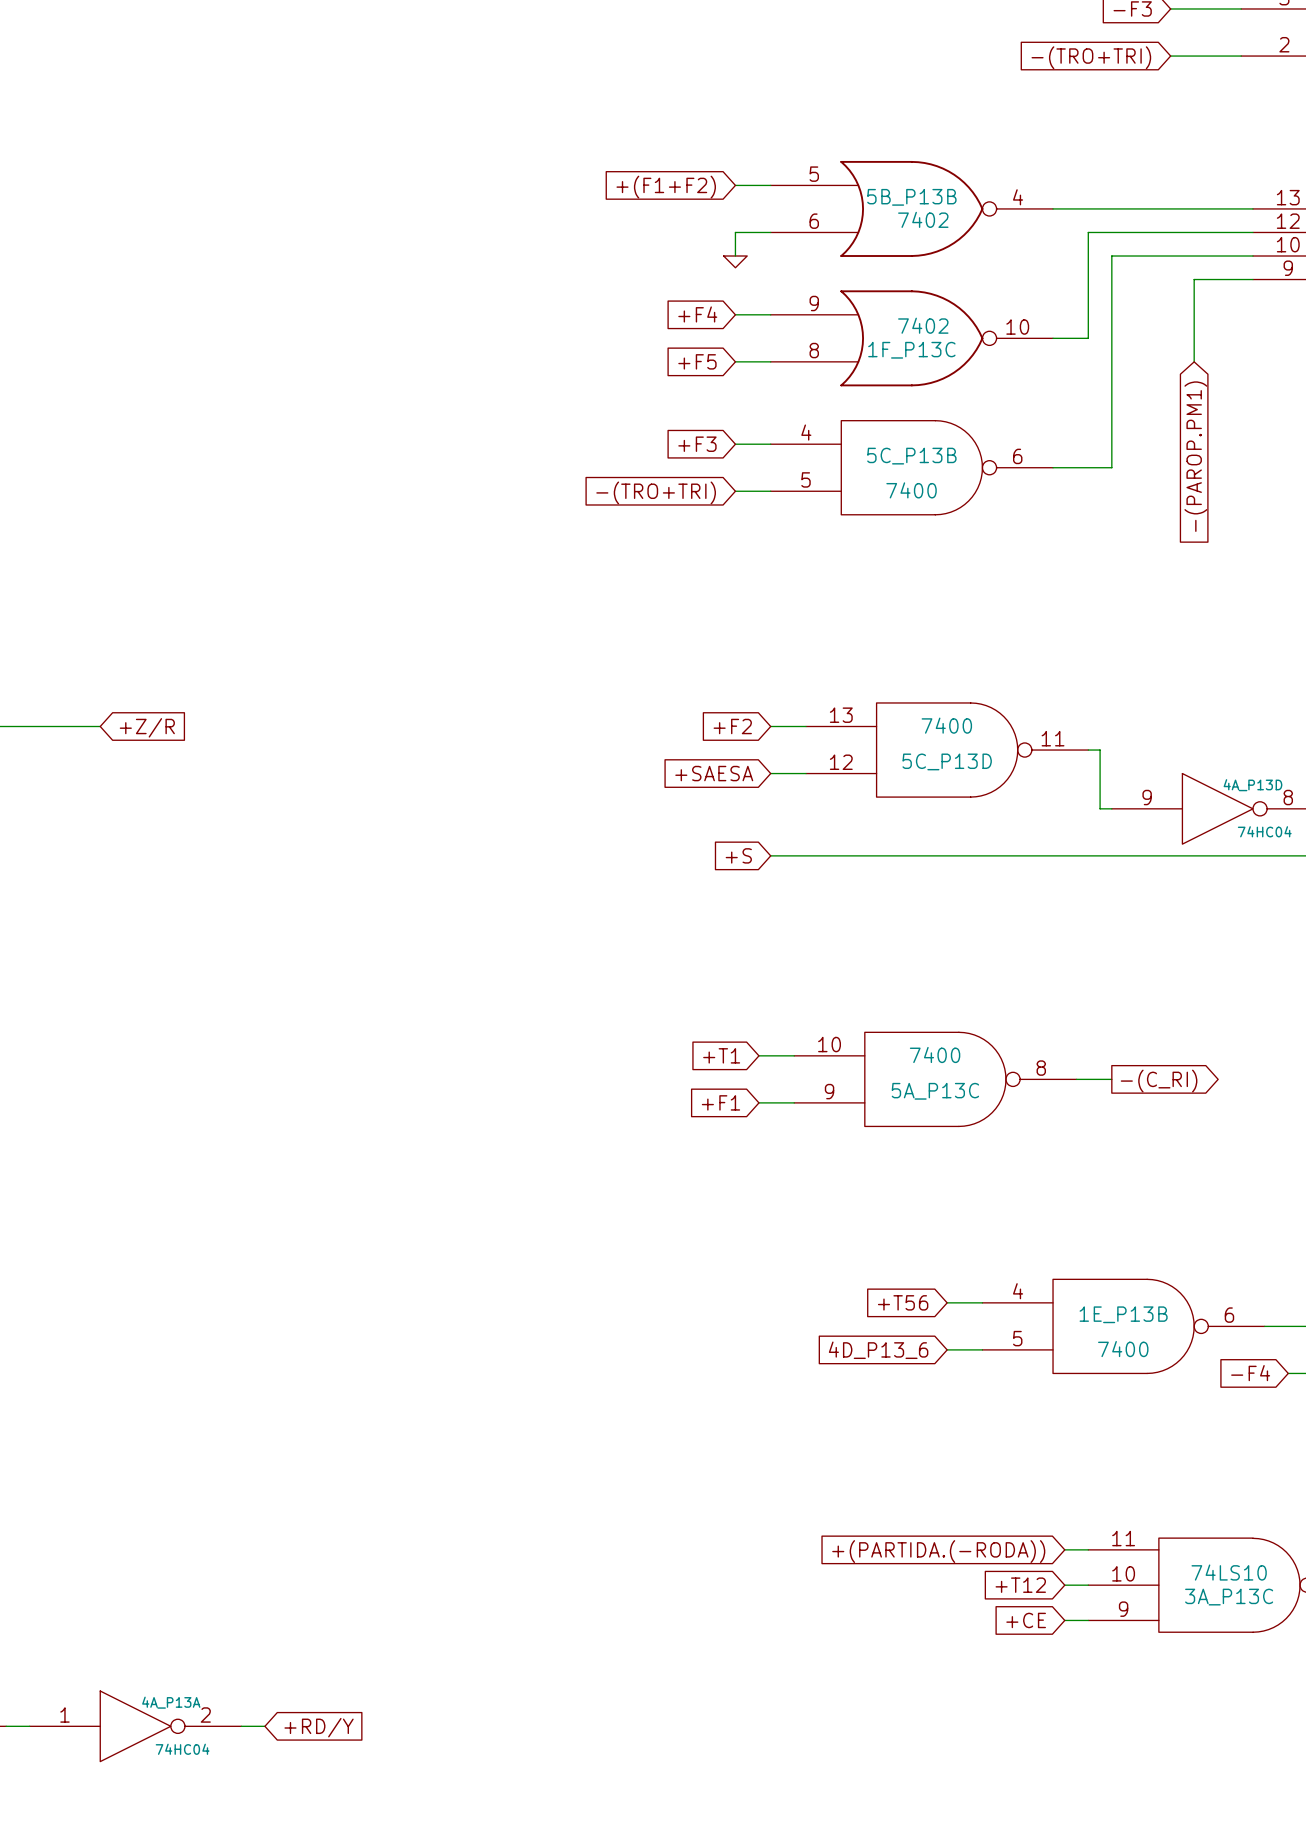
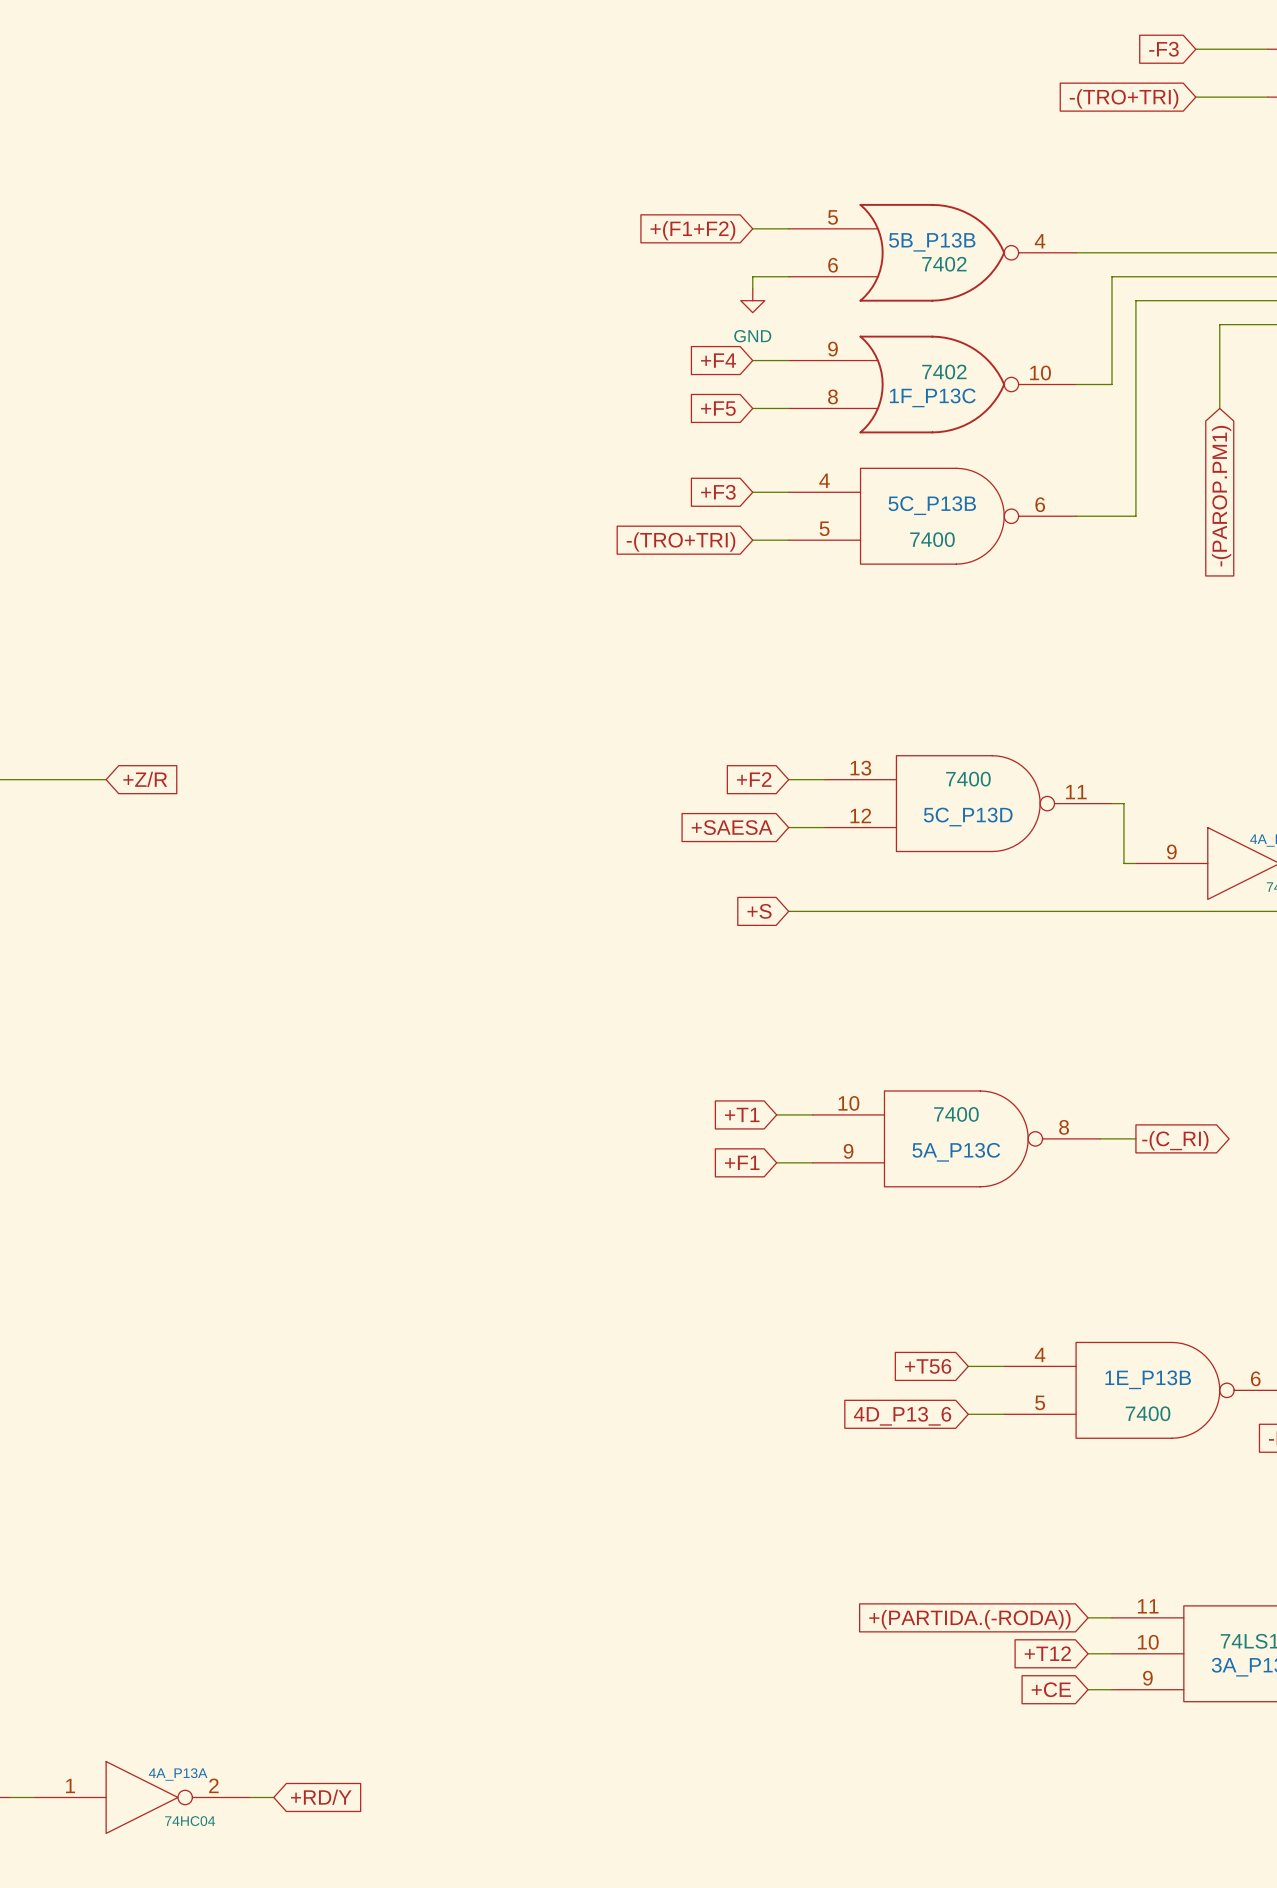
power symbol shape: [723, 256, 748, 268] -> [740, 288, 765, 313]
power symbol text: none -> GND (752, 336)

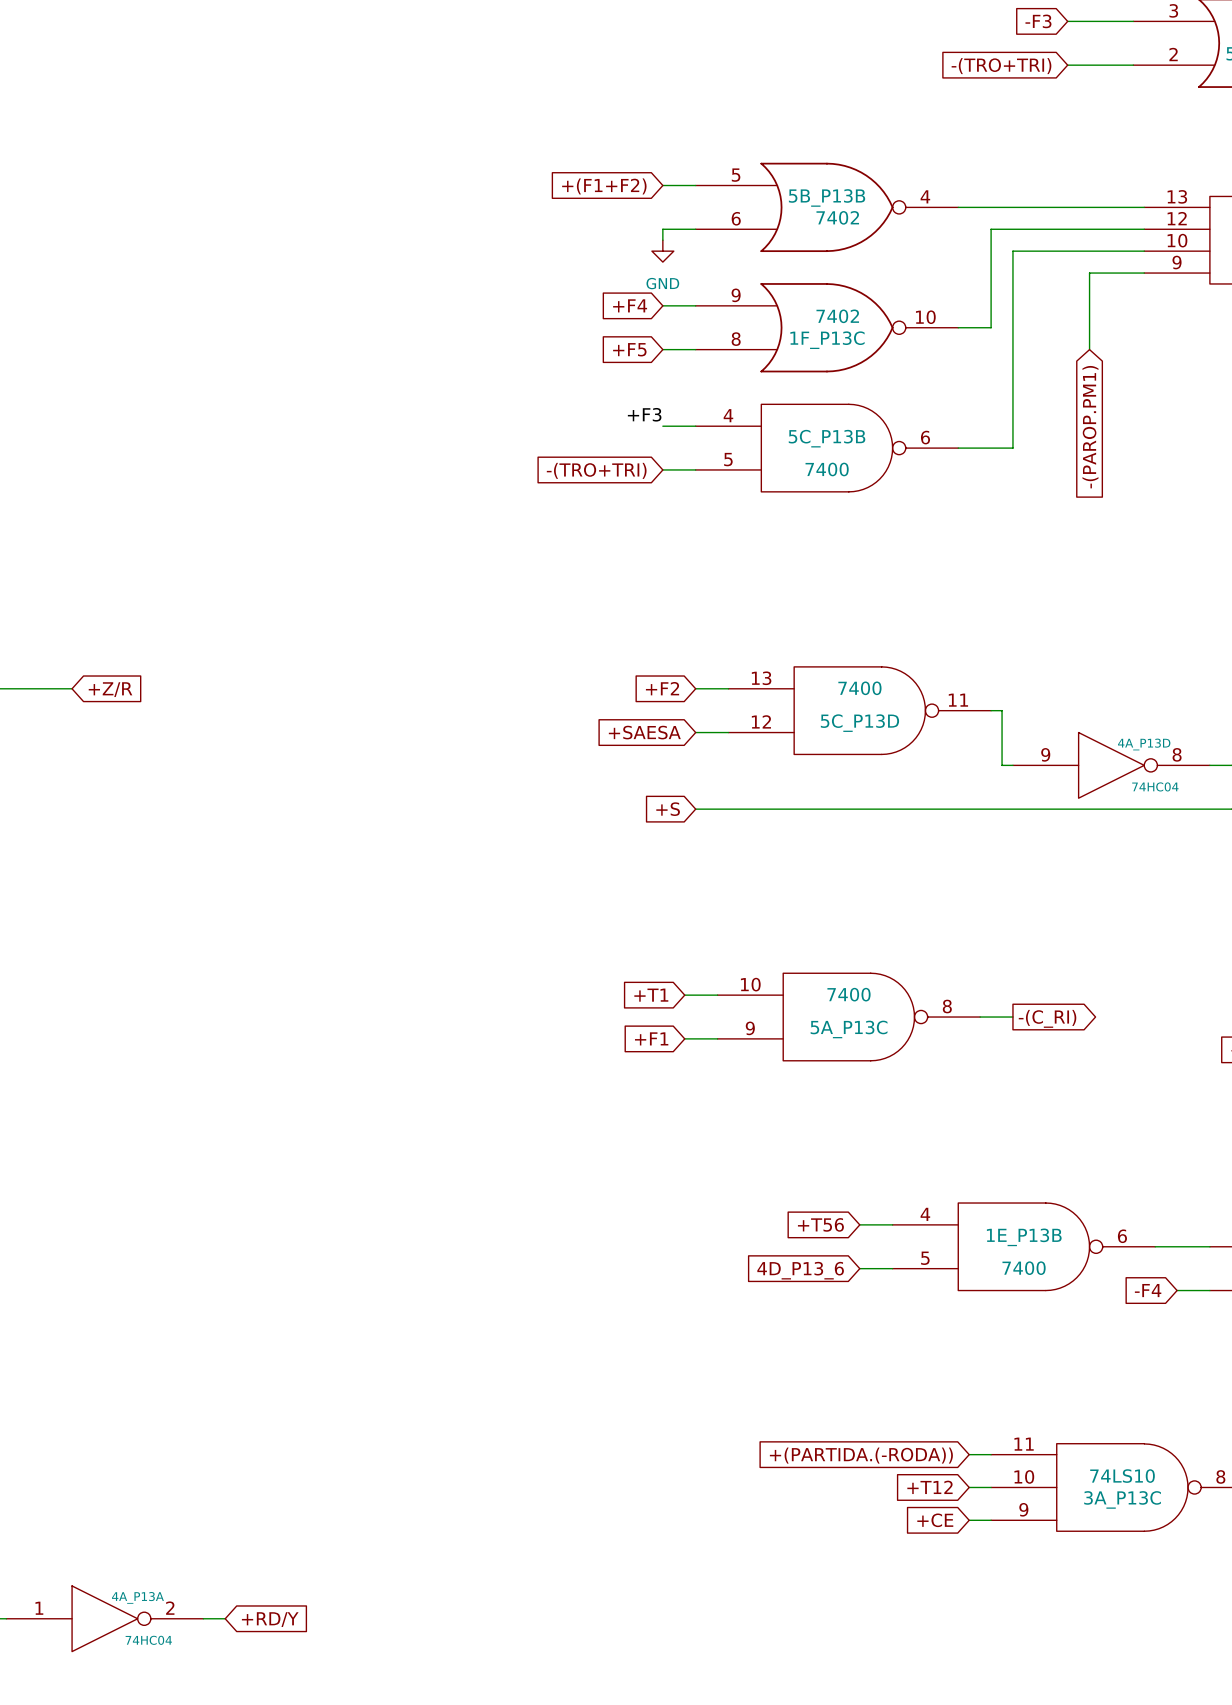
label: none -> +F3 (644, 414)
global label: +F3 (718, 492) -> none

